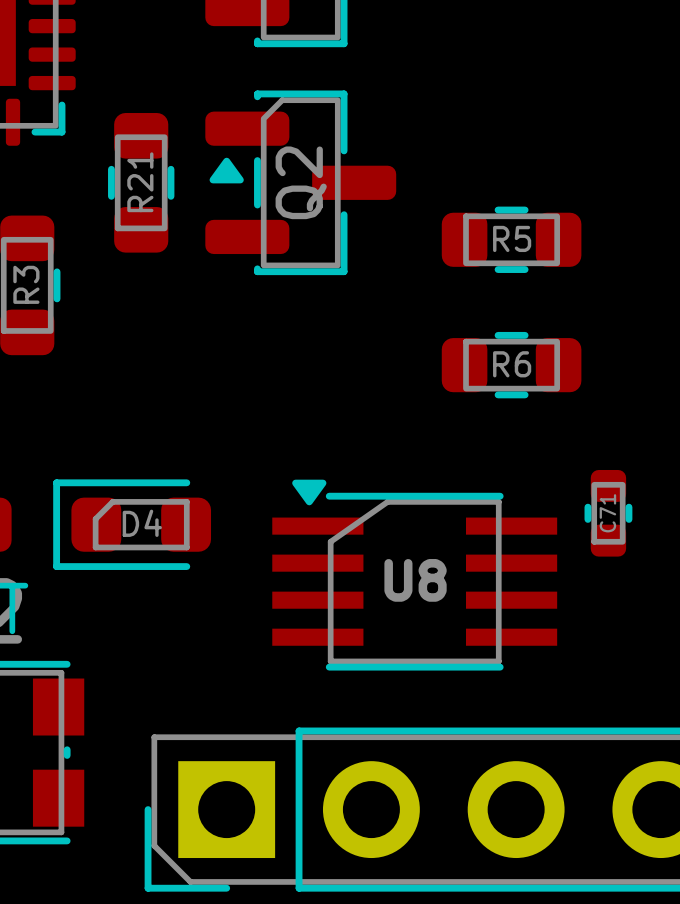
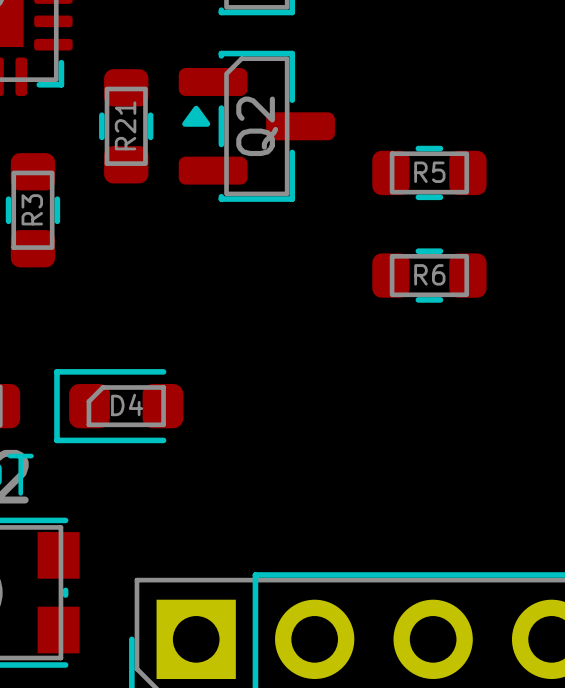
C71: (608, 513) -> none
U8: (414, 575) -> none

